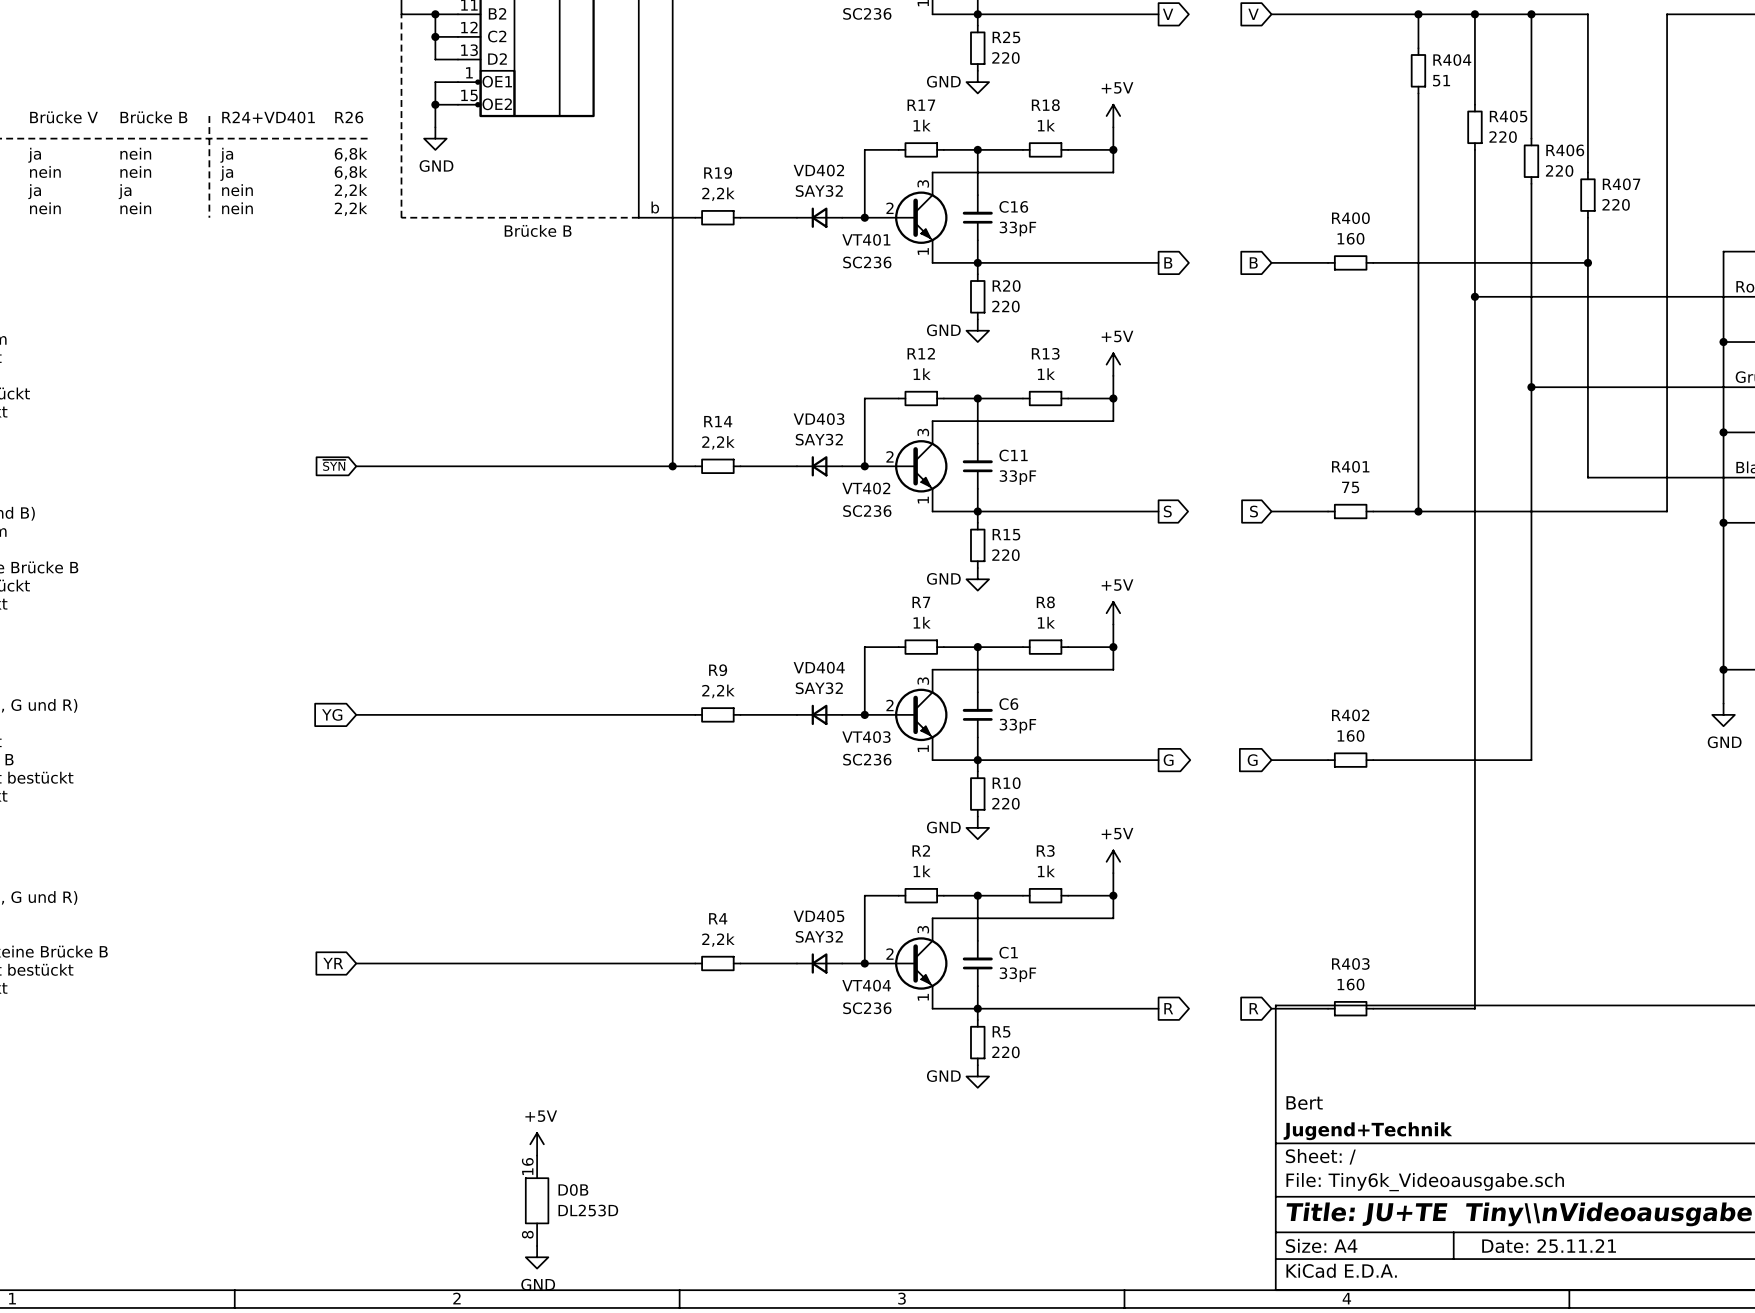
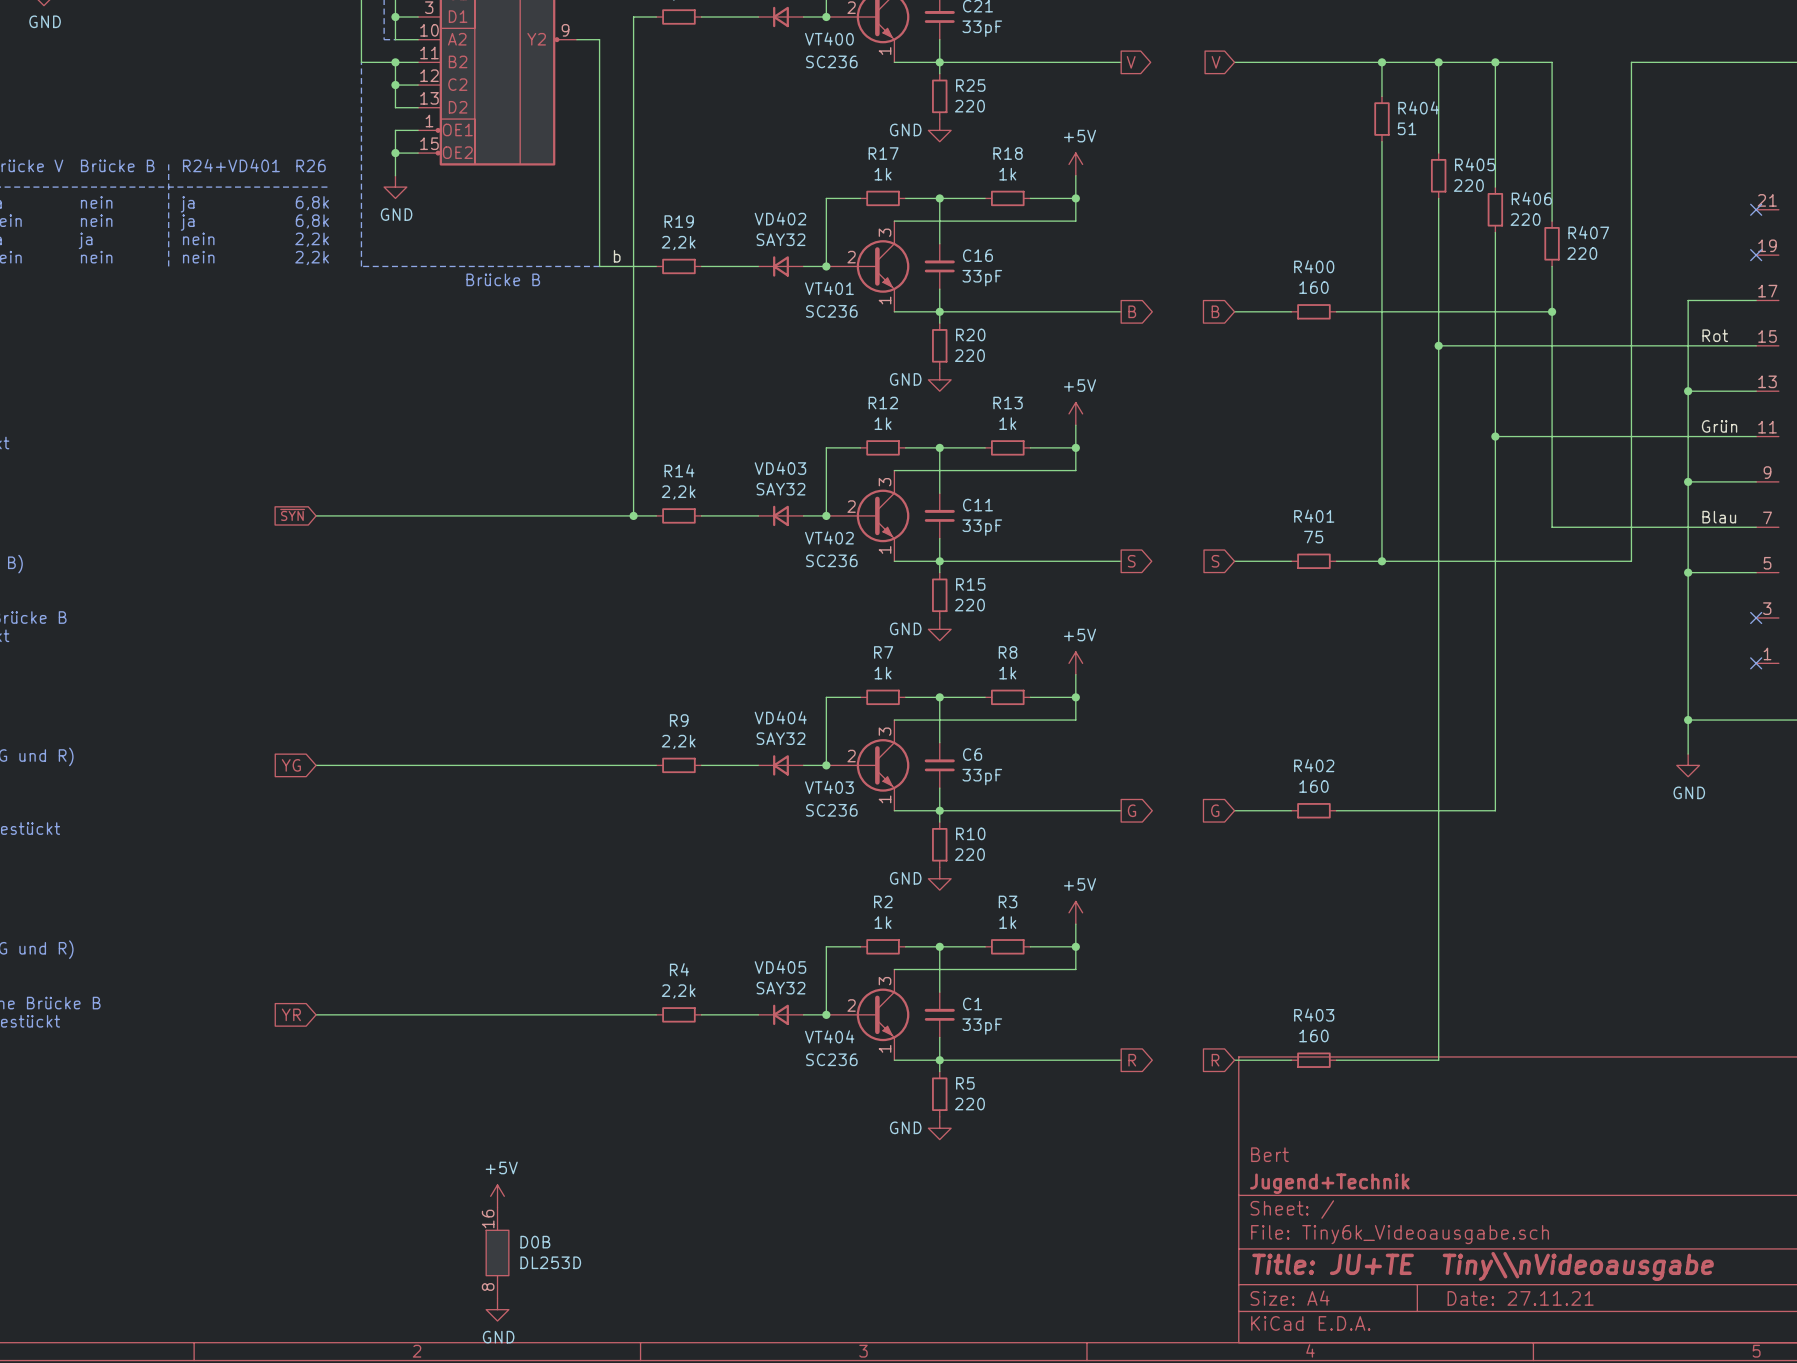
title block: Date: 25.11.21 (1549, 1246) -> Date: 27.11.21 (1520, 1298)

